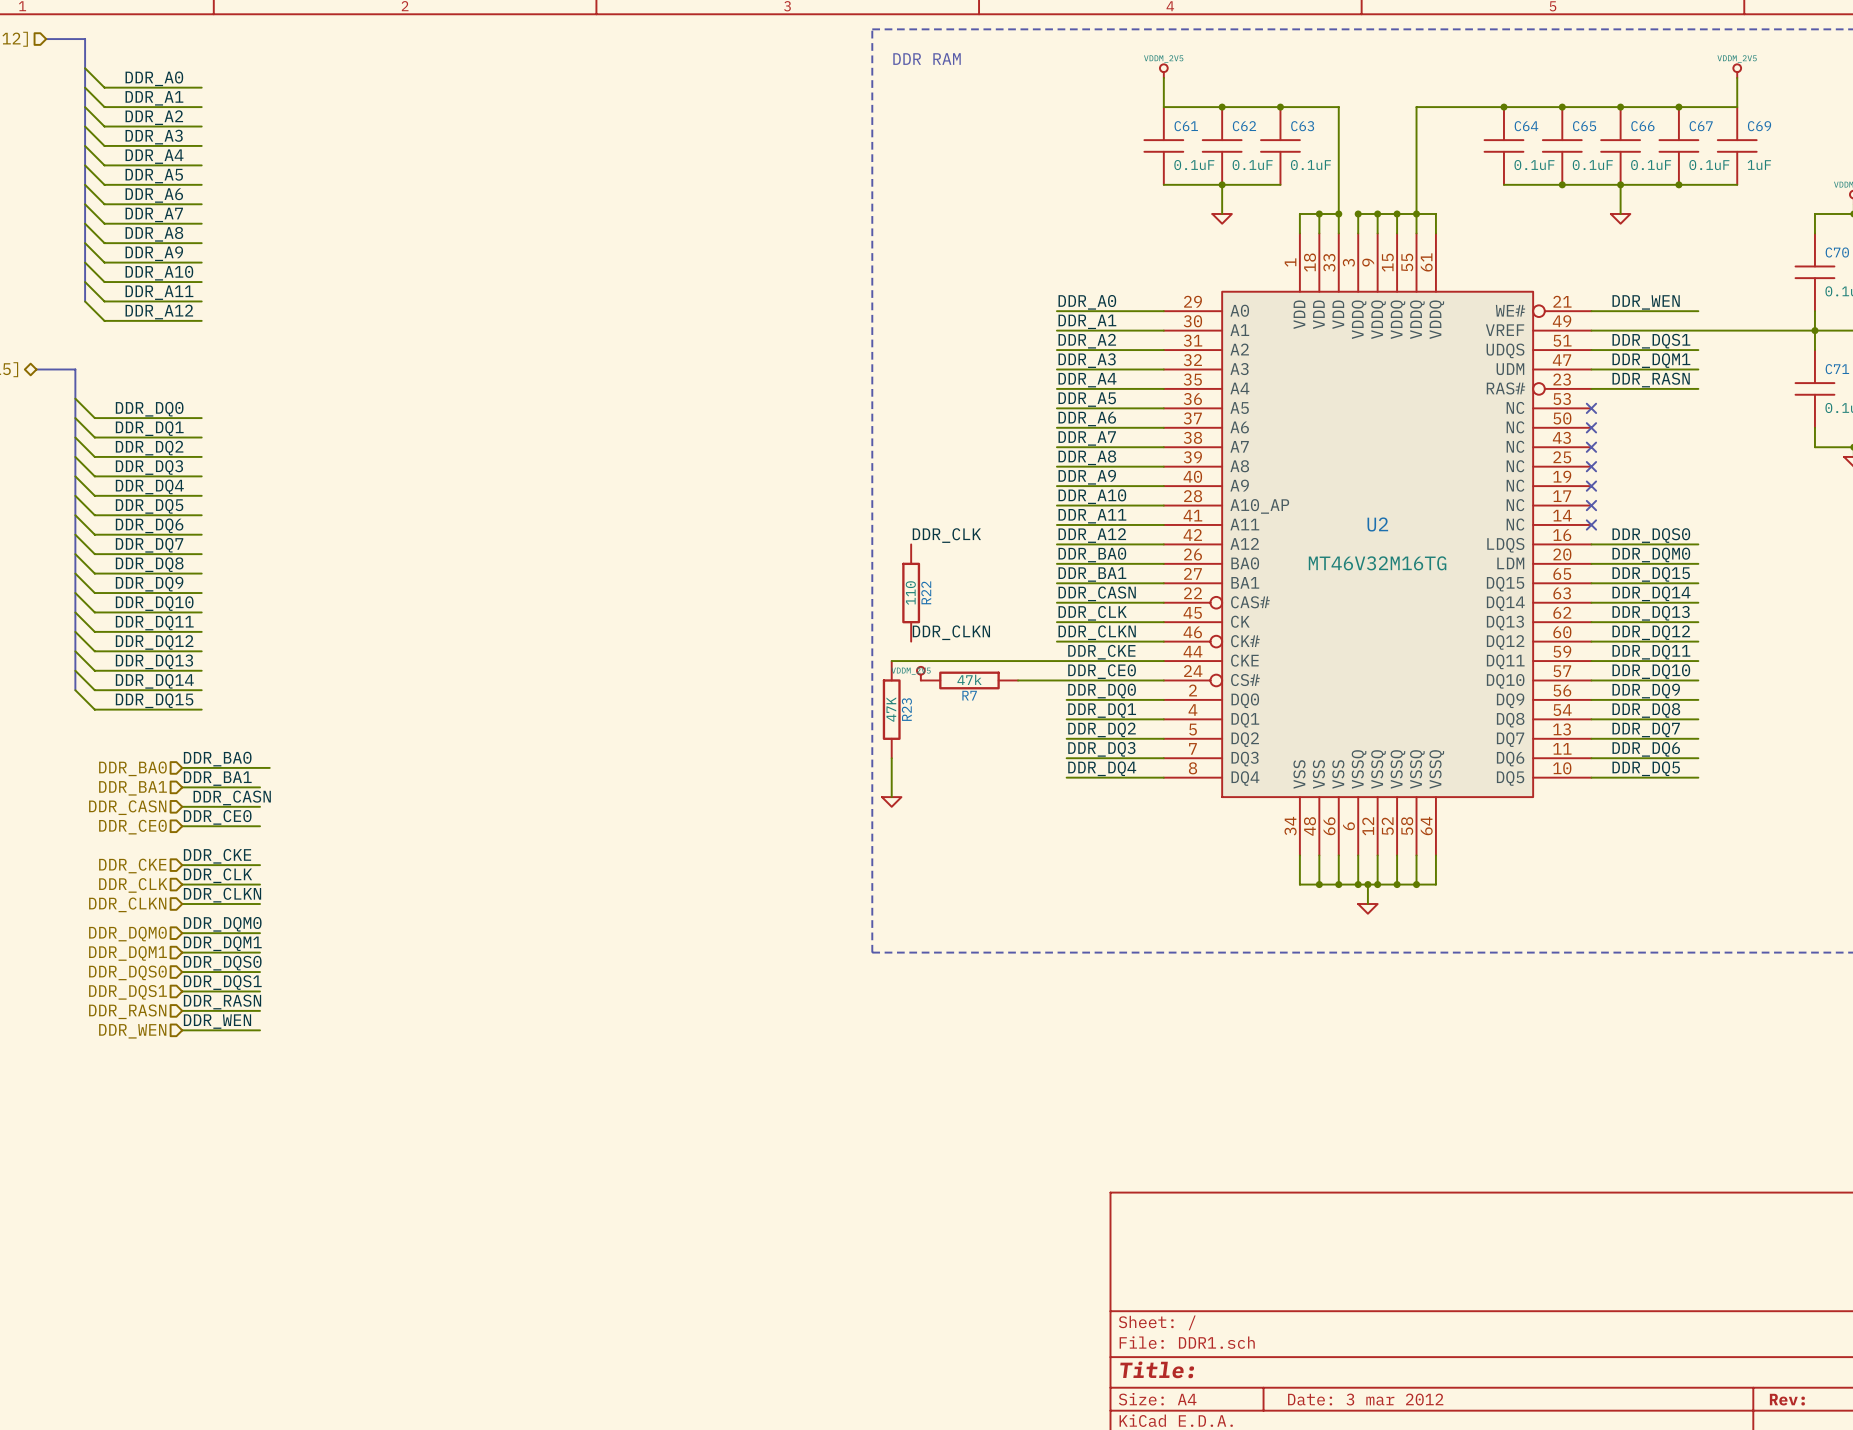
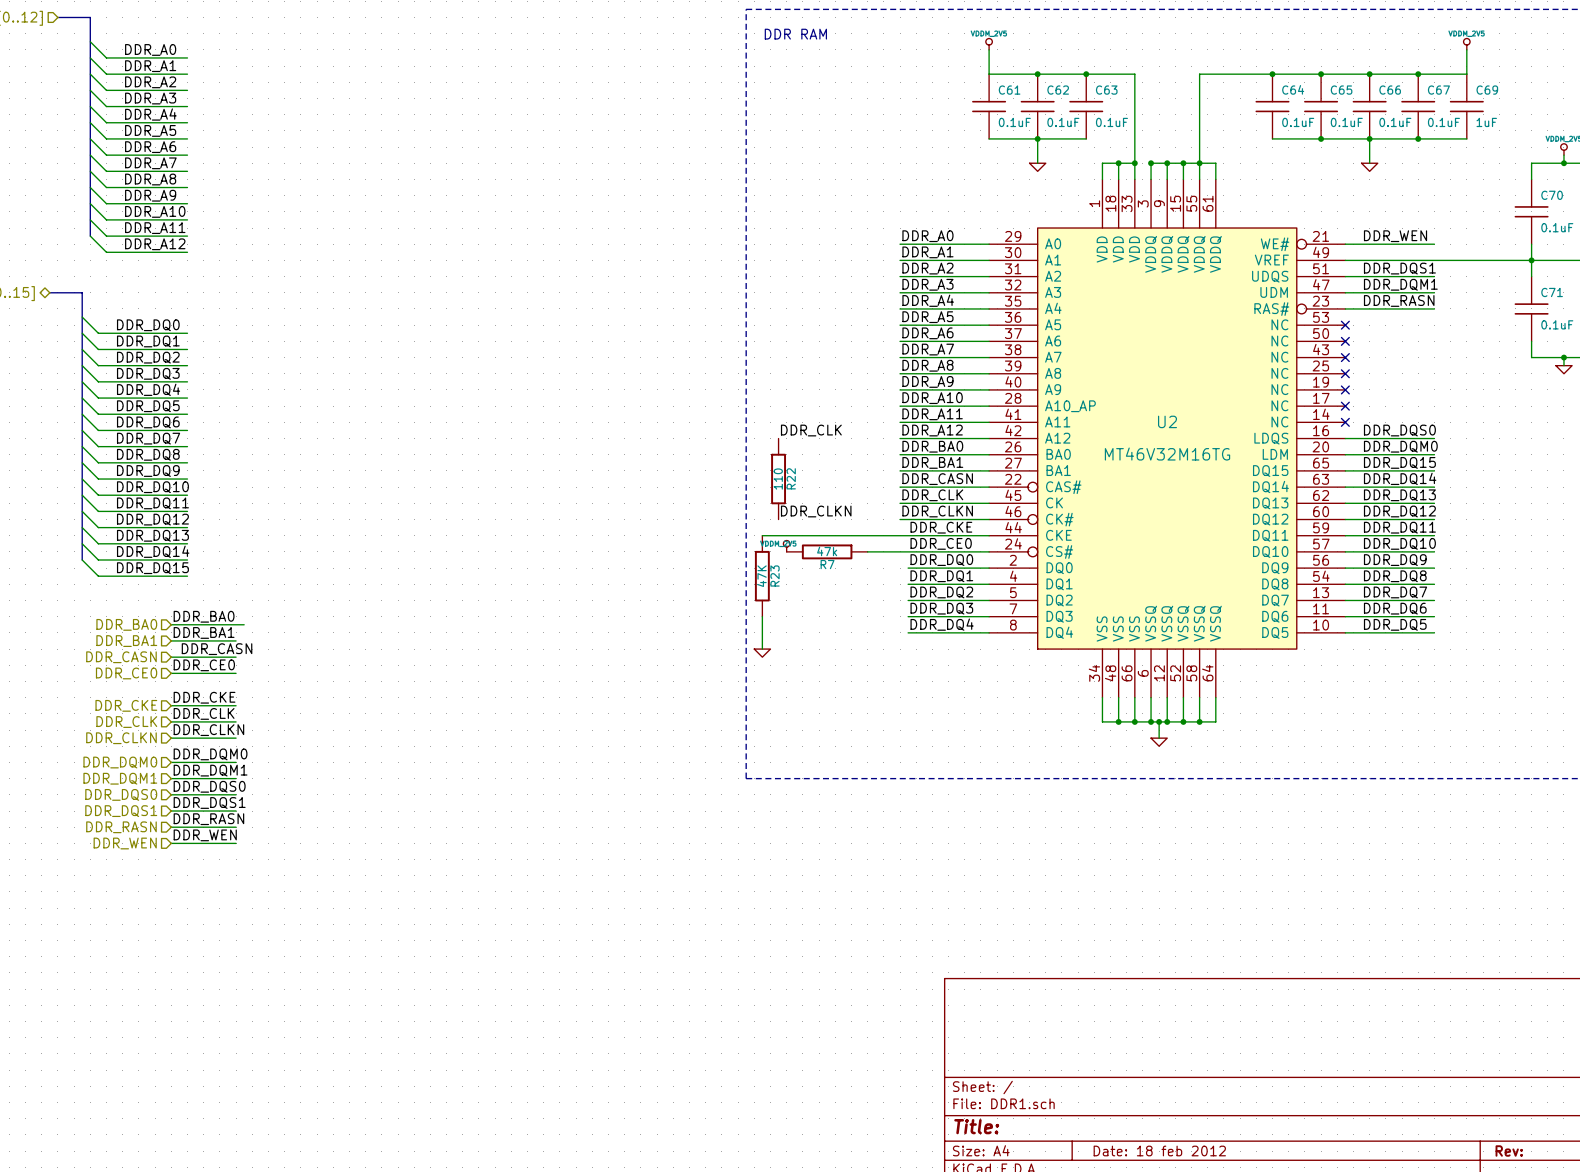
title block: Date: 3 mar 2012 (1365, 1399) -> Date: 18 feb 2012 (1159, 1150)

